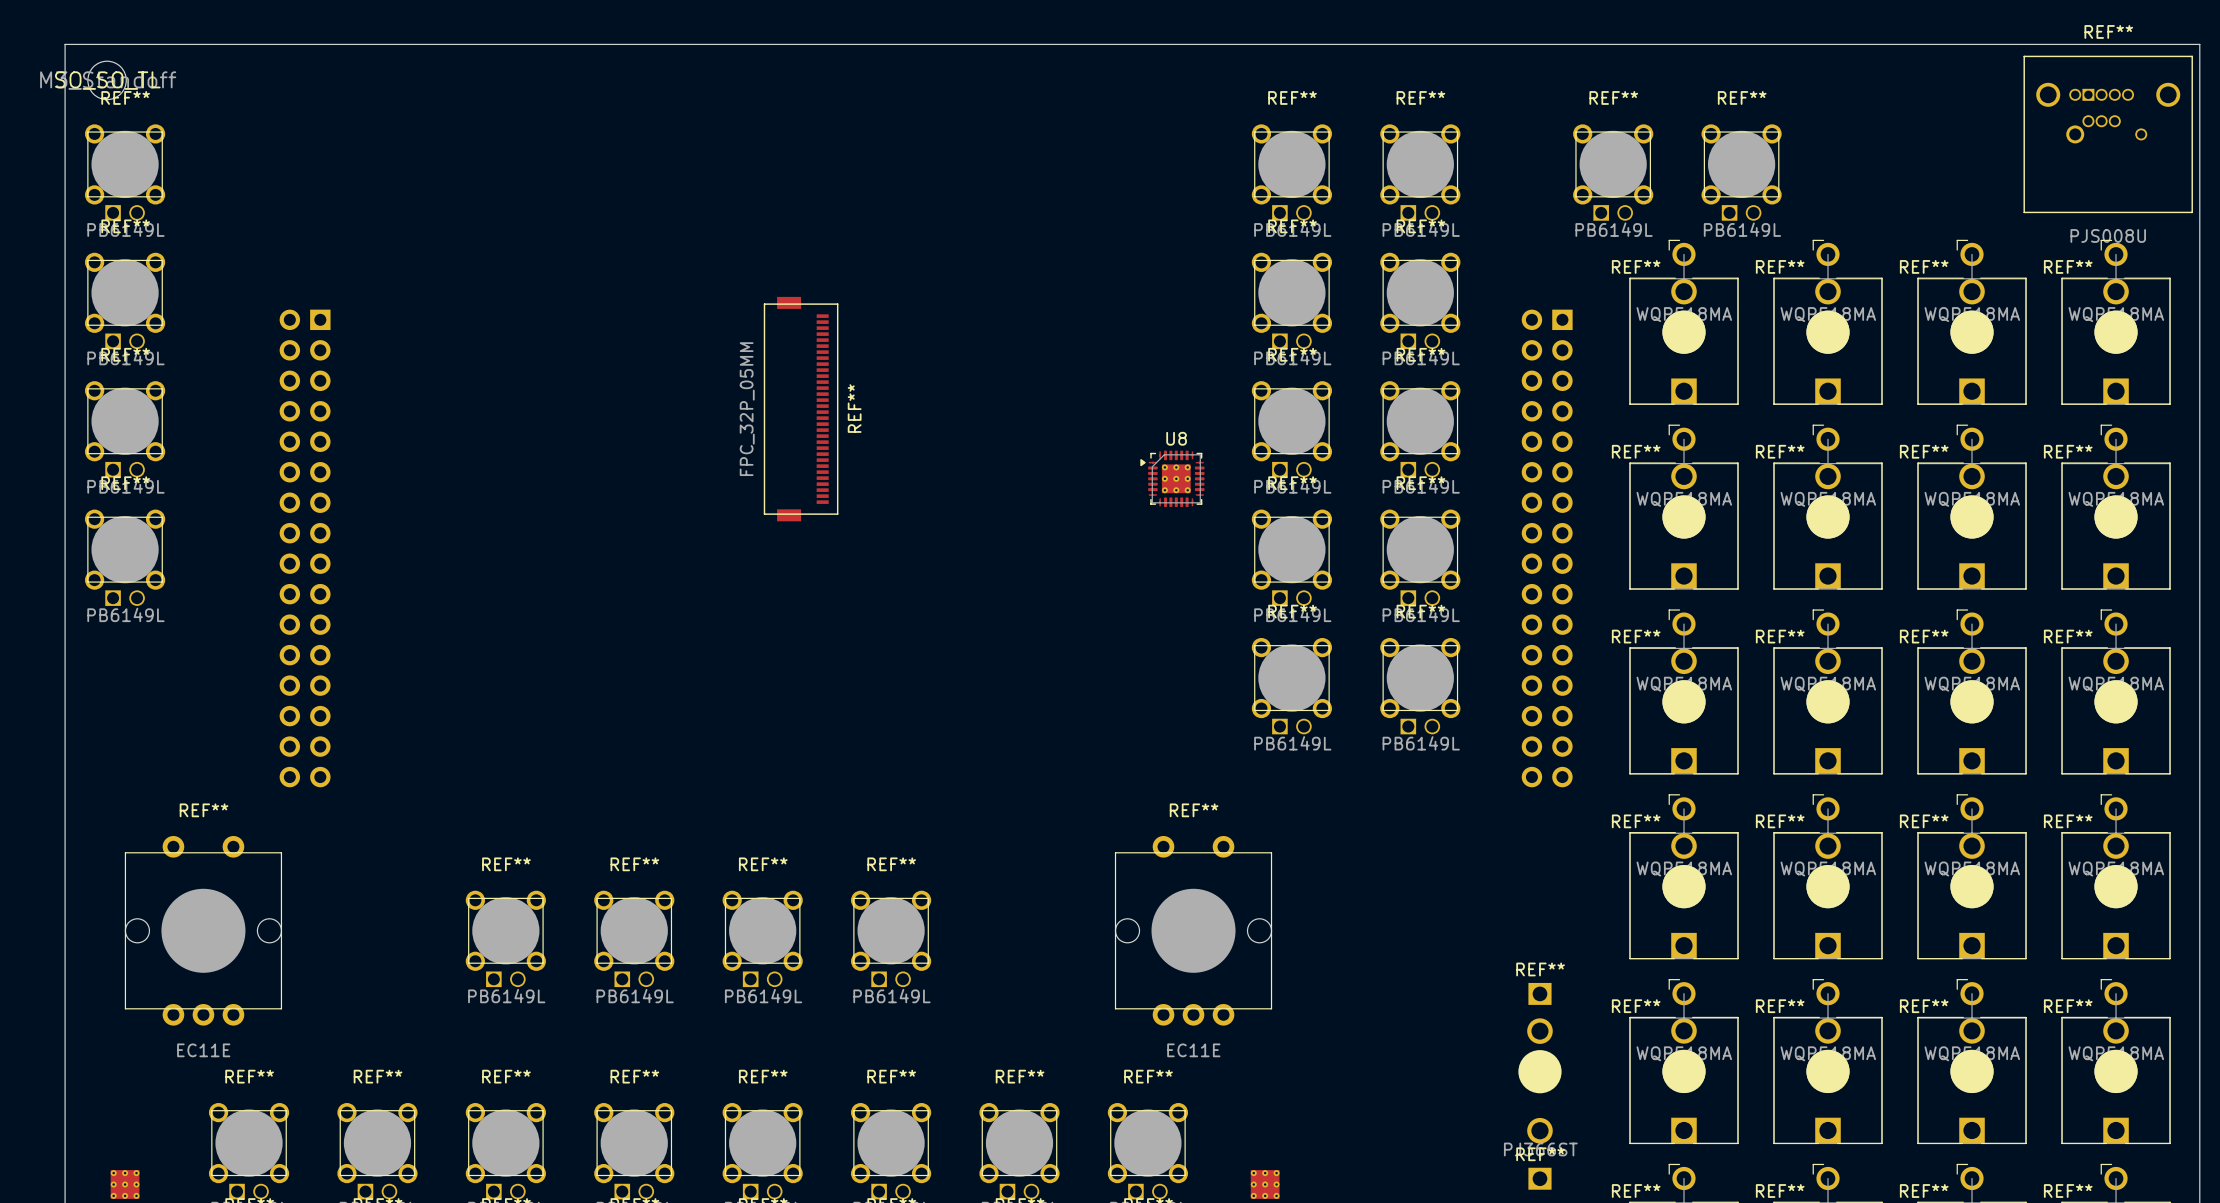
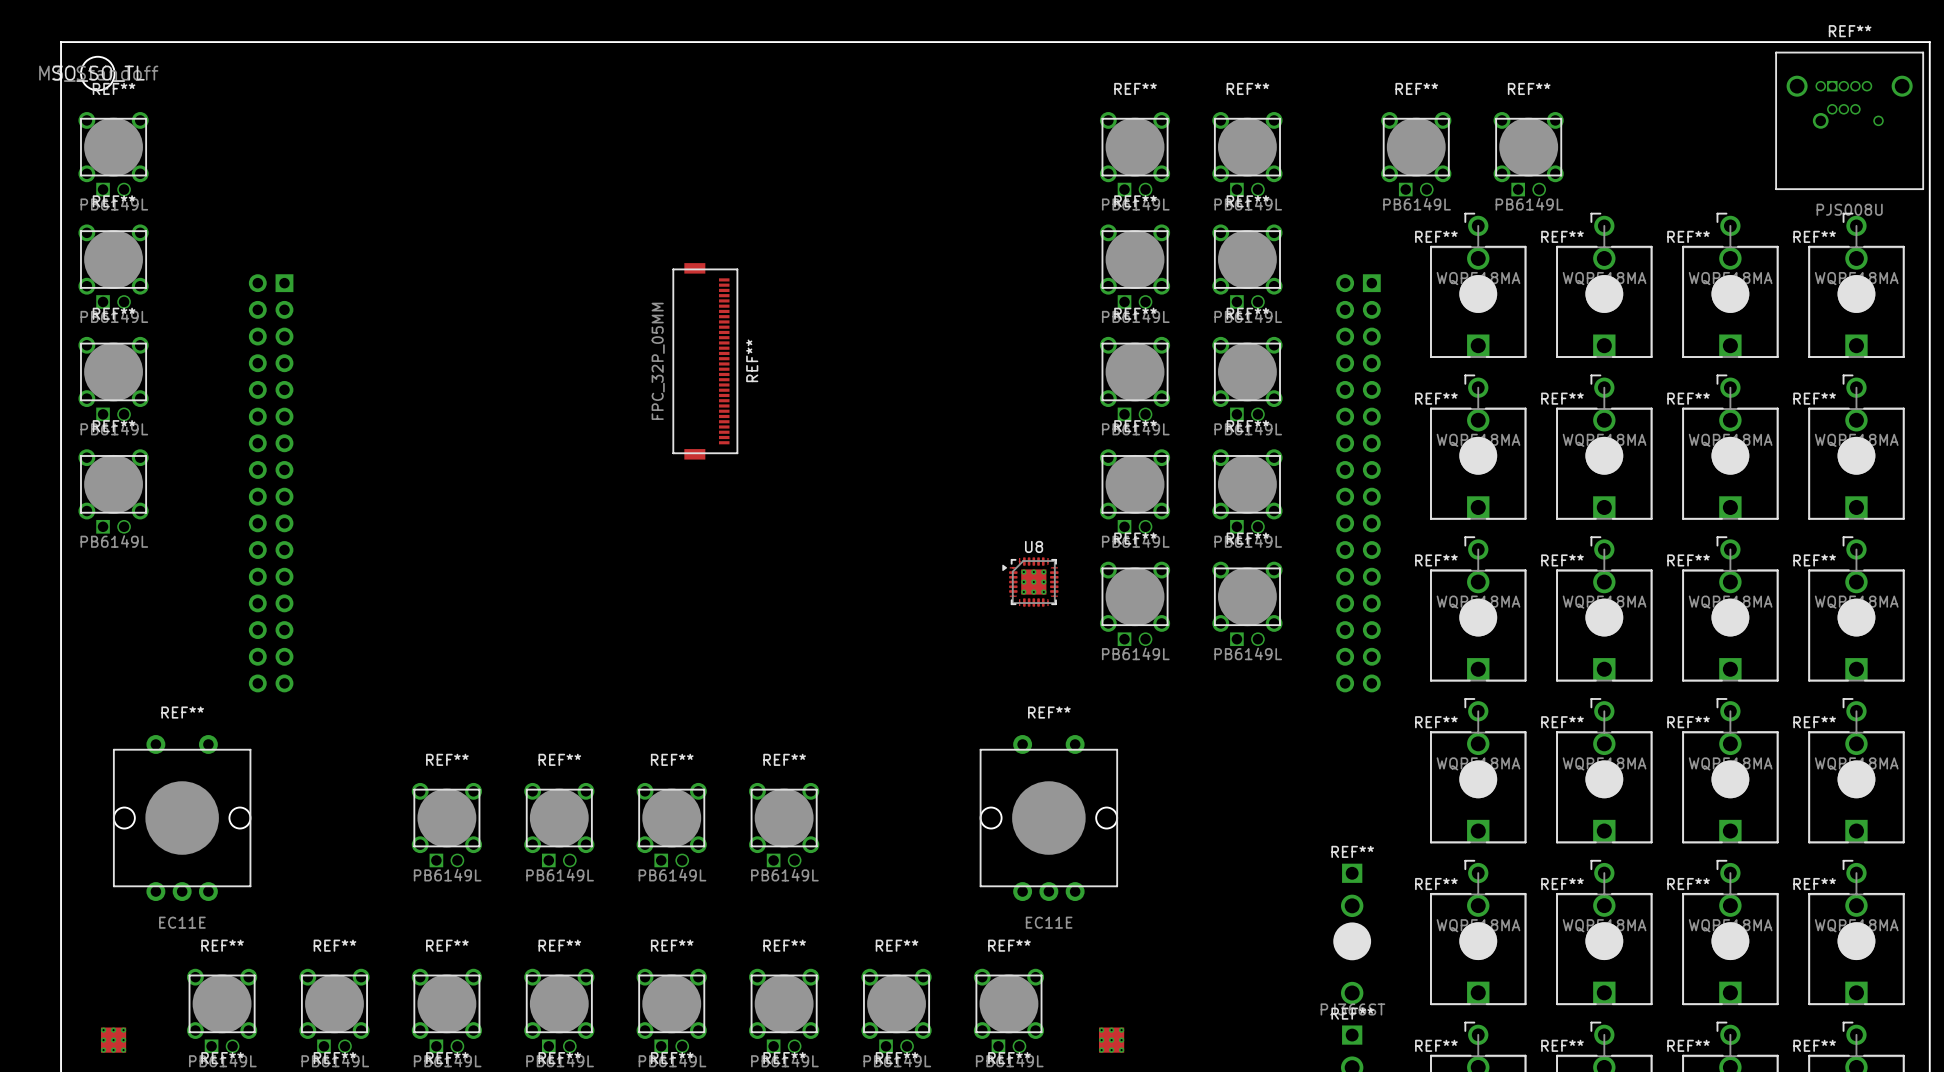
U8 position: (1172, 478) -> (1030, 582)

